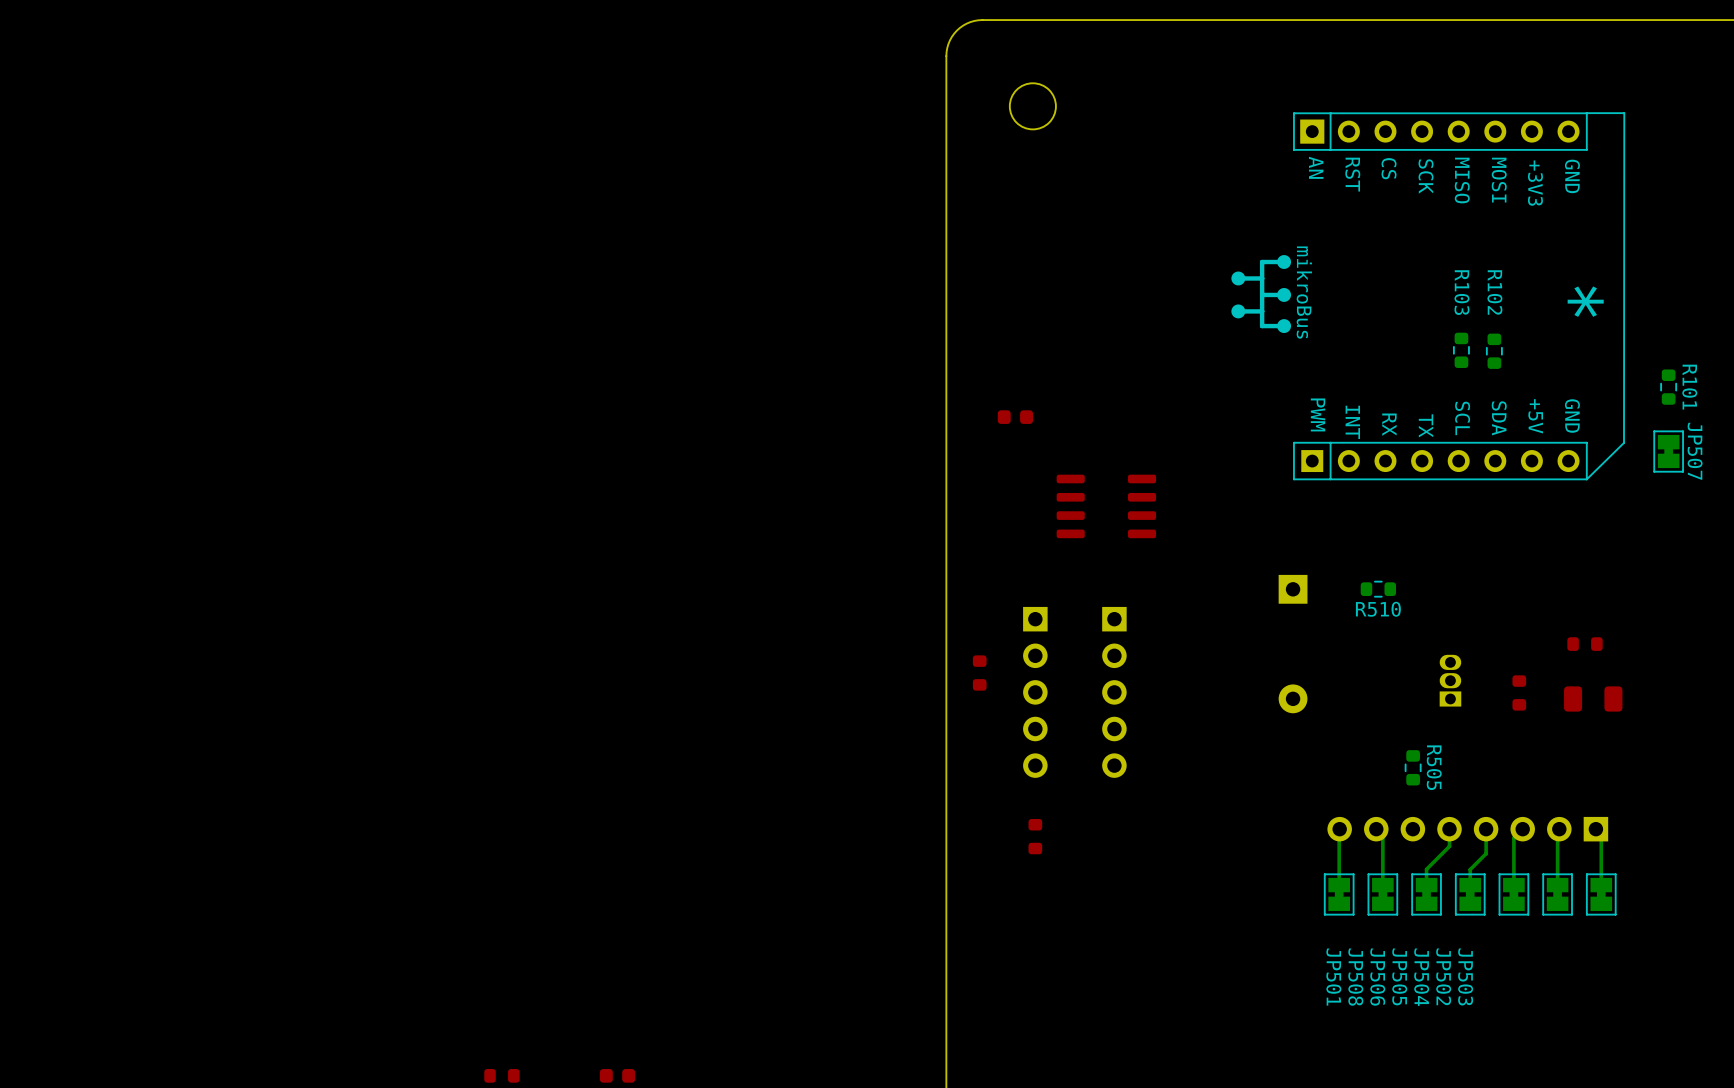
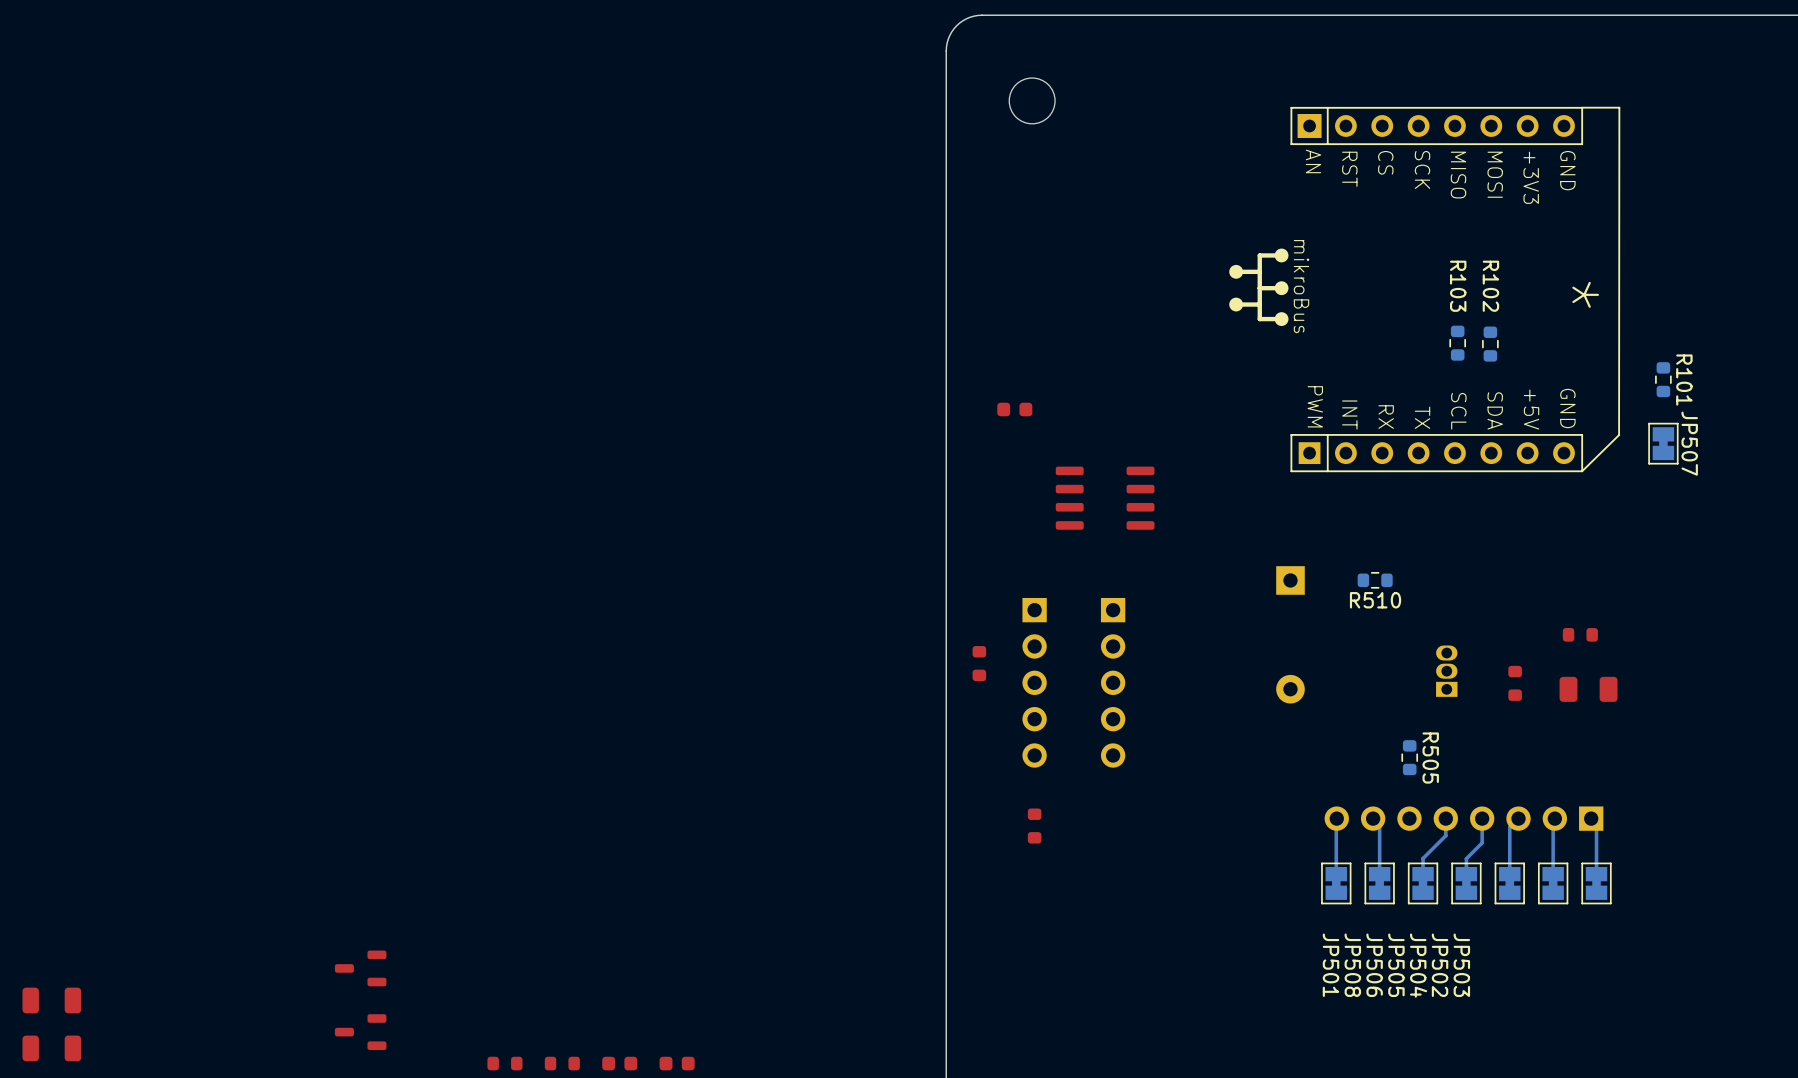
part: none -> (360, 968)
part: none -> (51, 1000)
part: none -> (360, 1032)
part: none -> (51, 1048)
part: none -> (562, 1063)
part: none -> (677, 1063)

